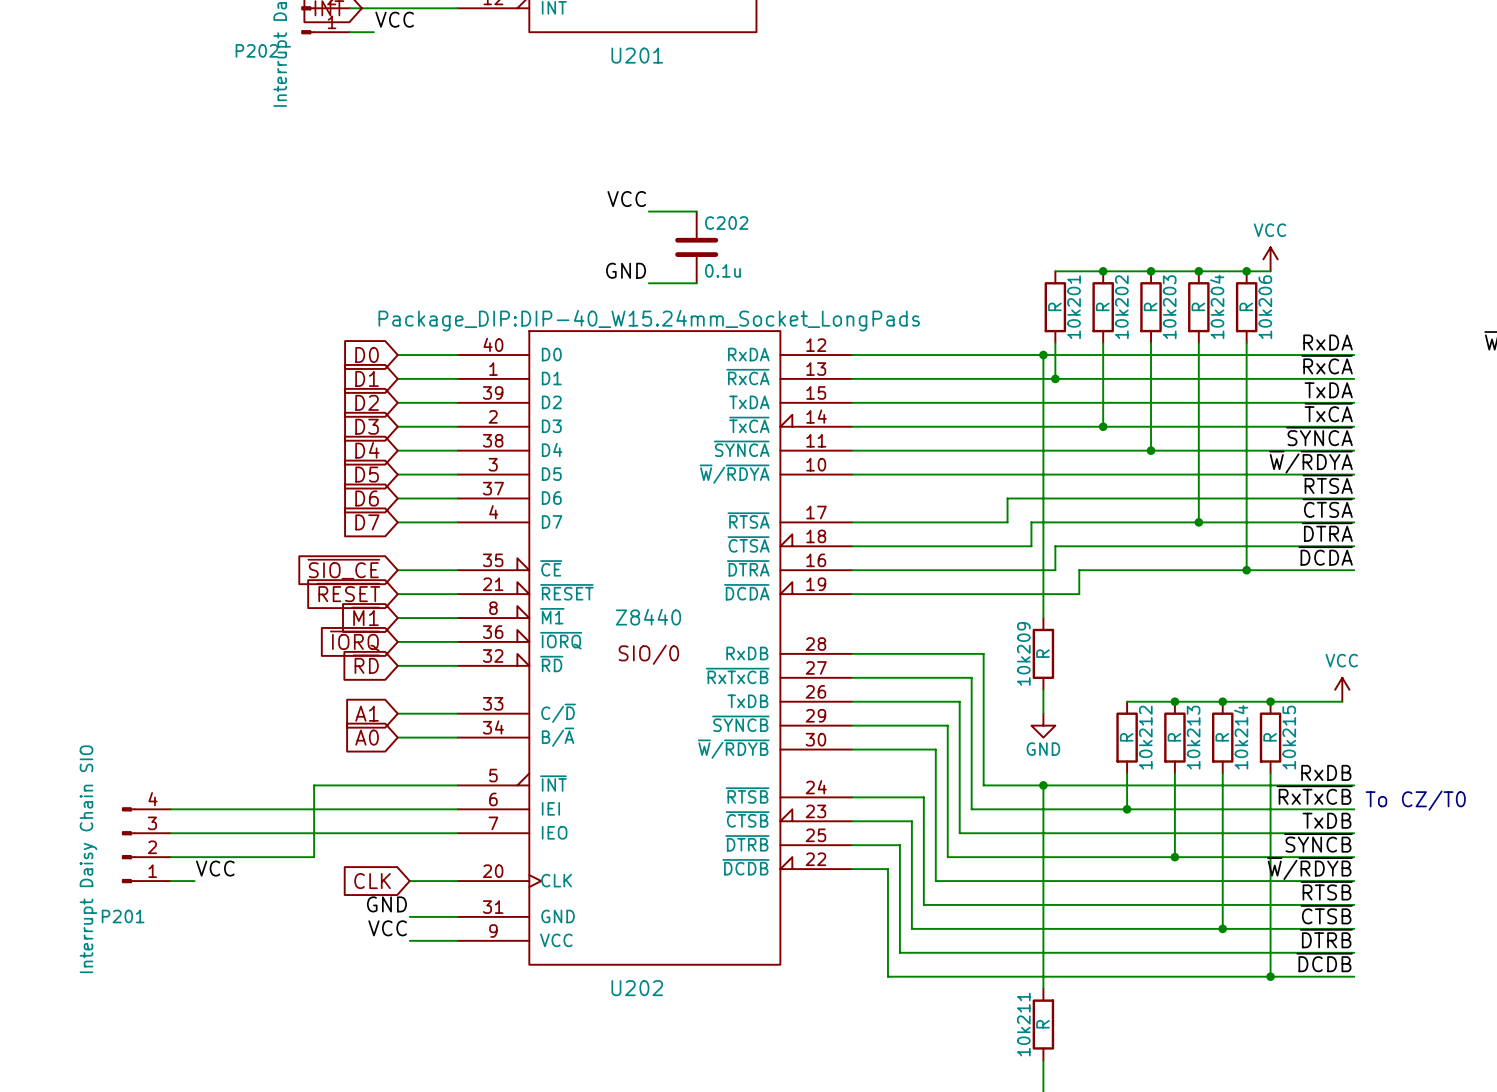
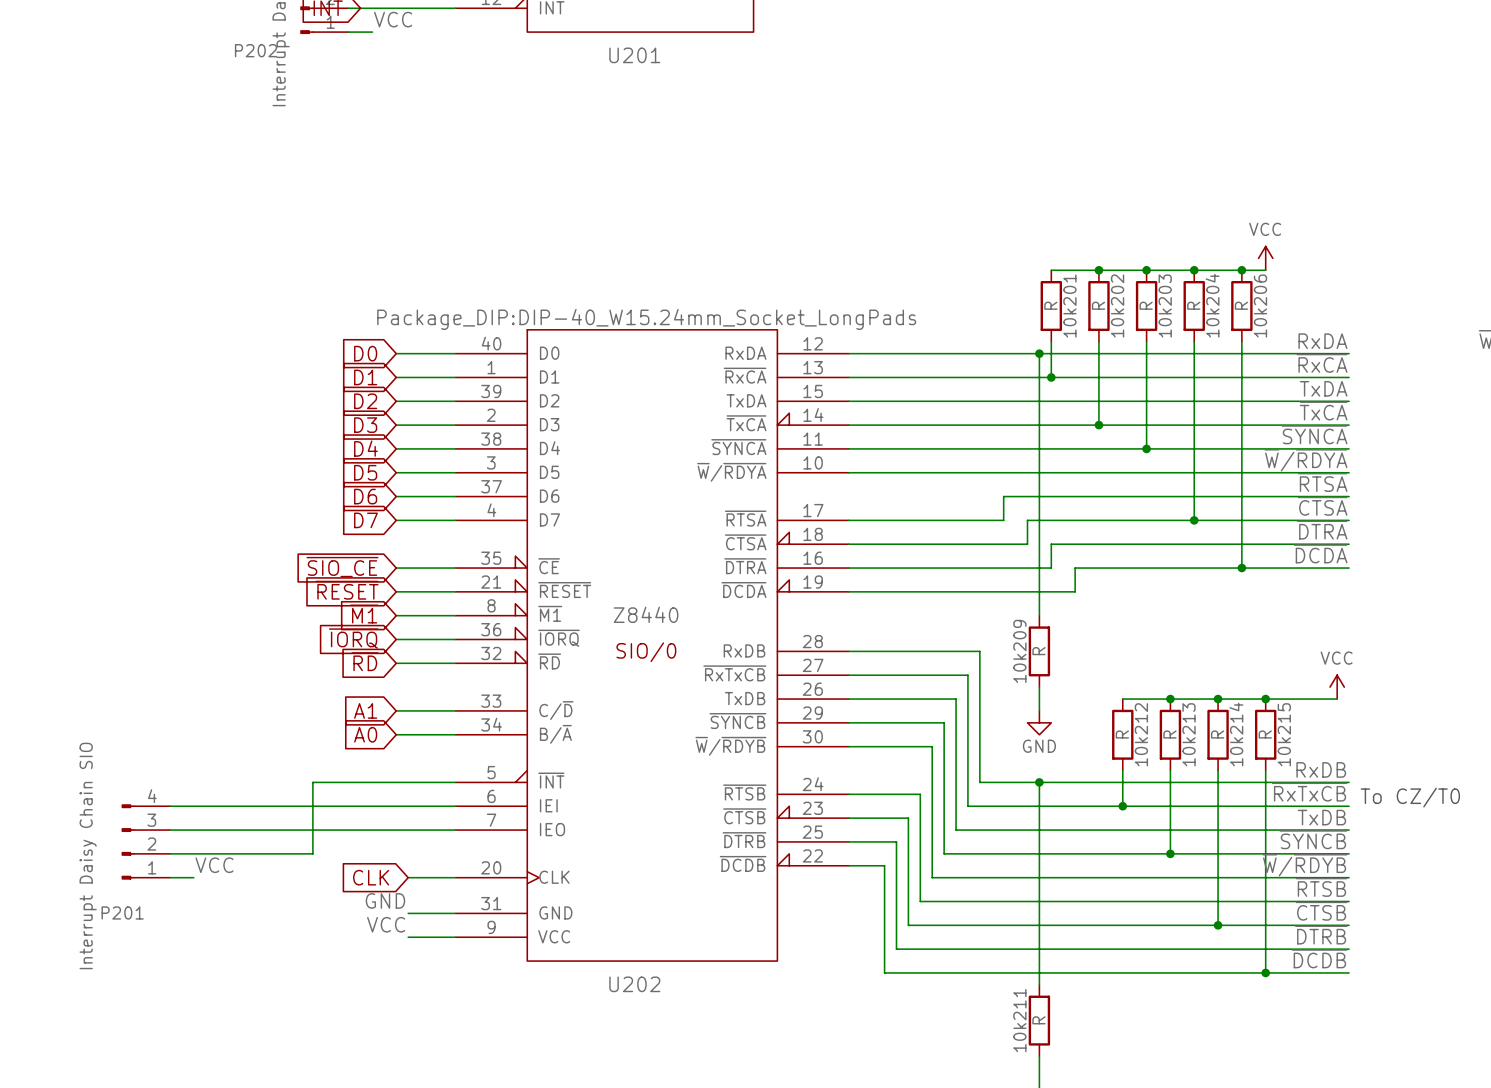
label: VCC (626, 199) -> none
wire: (648, 211) (696, 211) -> none
C202: 0.1u (696, 247) -> none
label: GND (626, 270) -> none
wire: (648, 283) (696, 283) -> none

